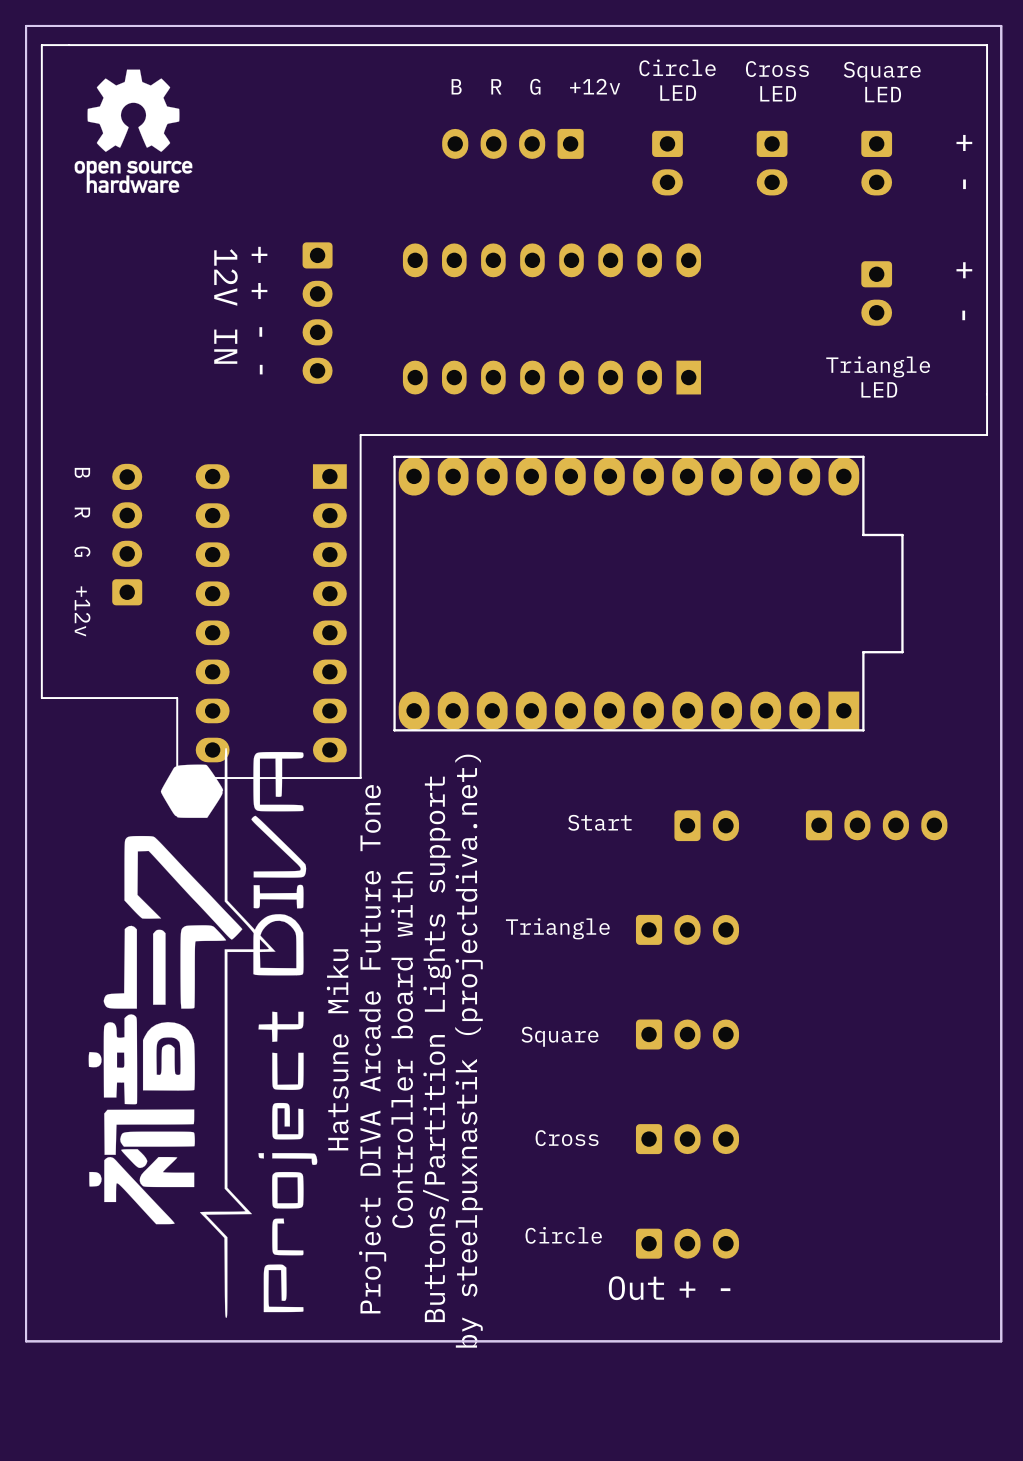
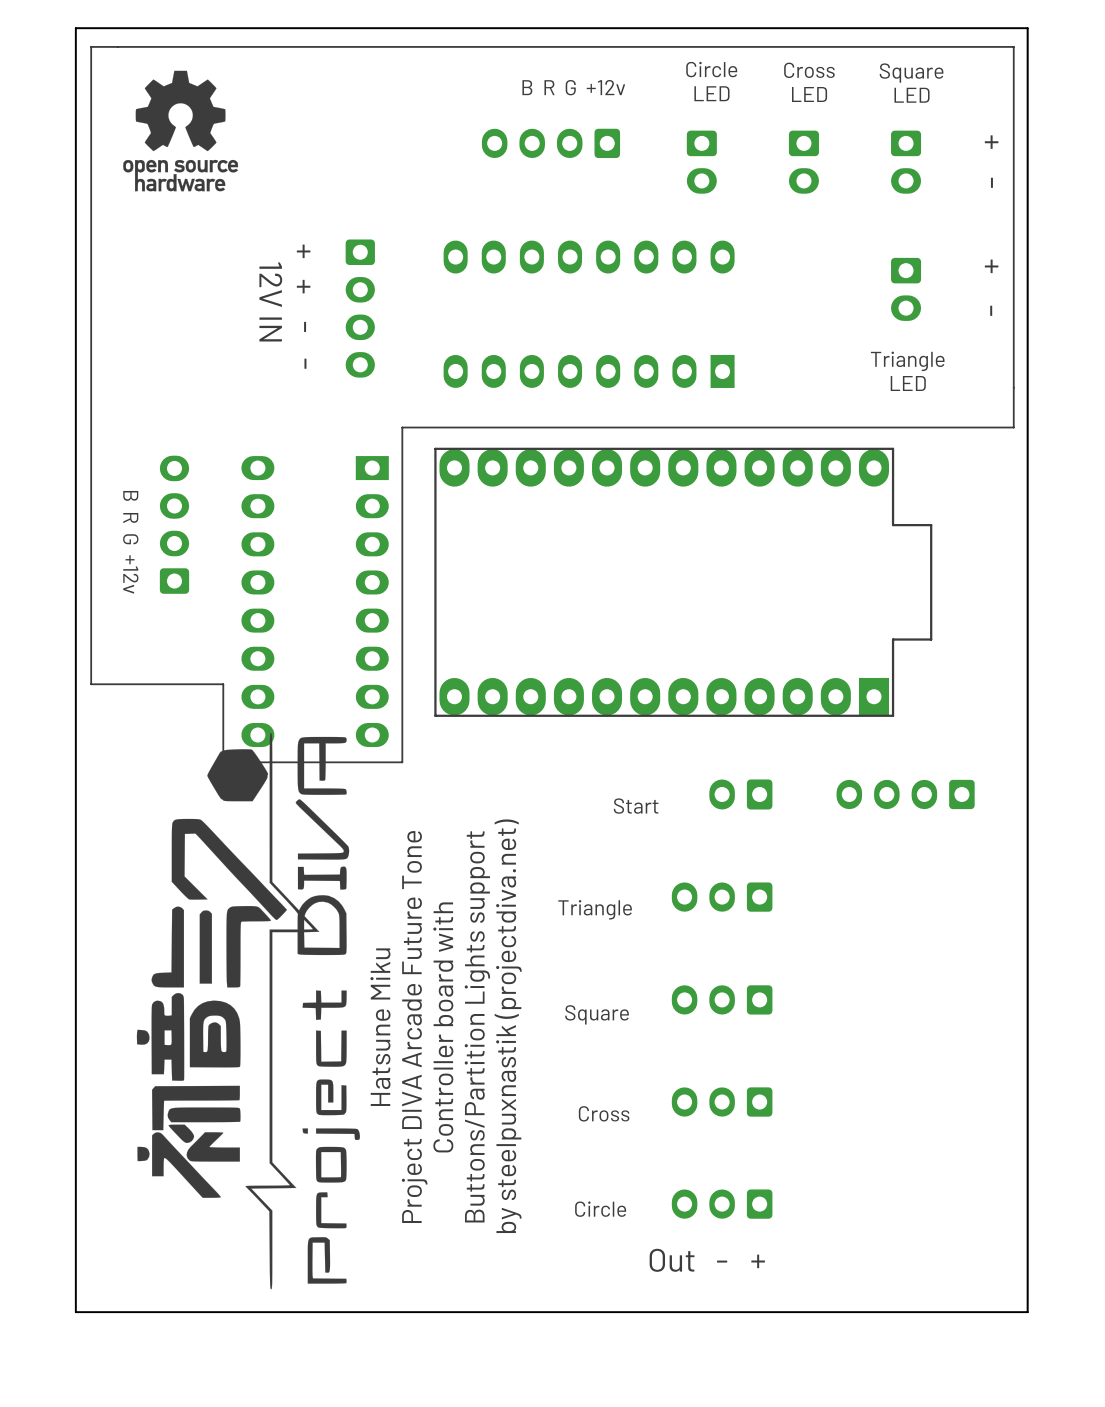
part rotation: 0° (706, 825) -> 180° (740, 794)
part rotation: 0° (876, 825) -> 180° (905, 794)
part rotation: 0° (687, 929) -> 180° (722, 897)
part rotation: 0° (687, 1034) -> 180° (722, 999)
part rotation: 0° (687, 1139) -> 180° (722, 1102)
part rotation: 0° (687, 1243) -> 180° (722, 1204)
text: + (687, 1289) -> - (722, 1261)
text: - (725, 1289) -> + (758, 1261)

